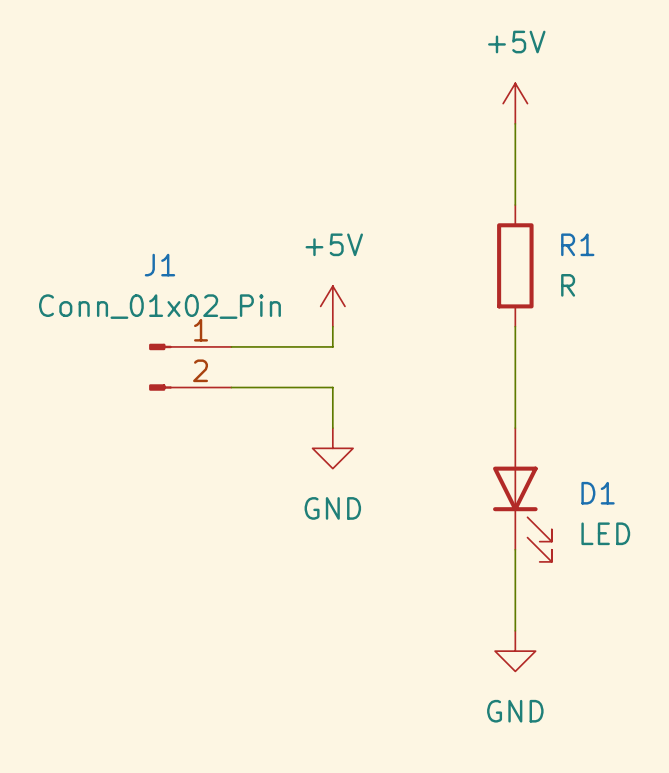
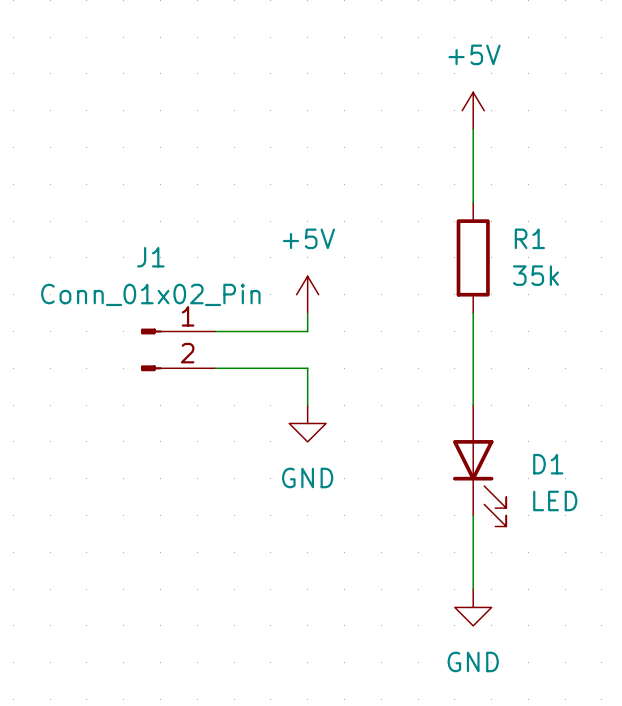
R1 value: R (568, 285) -> 35k (535, 275)

